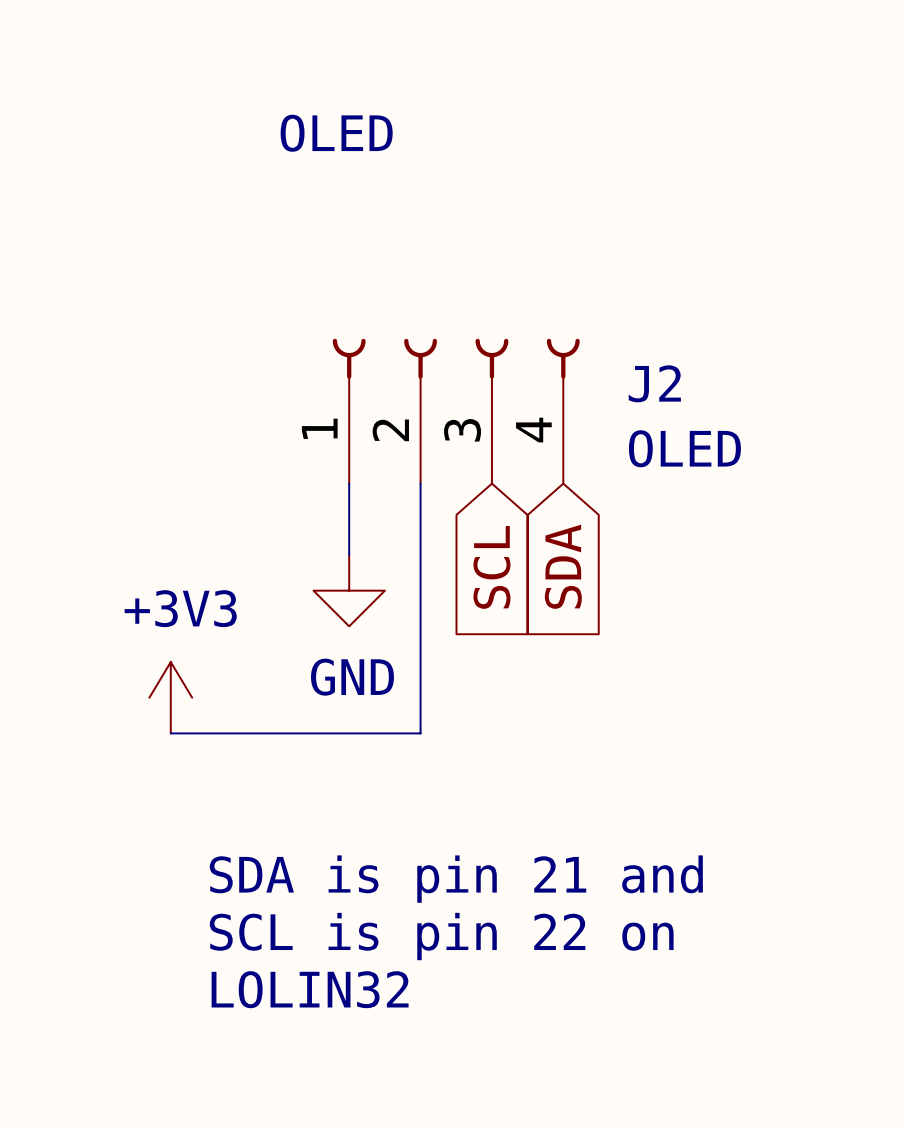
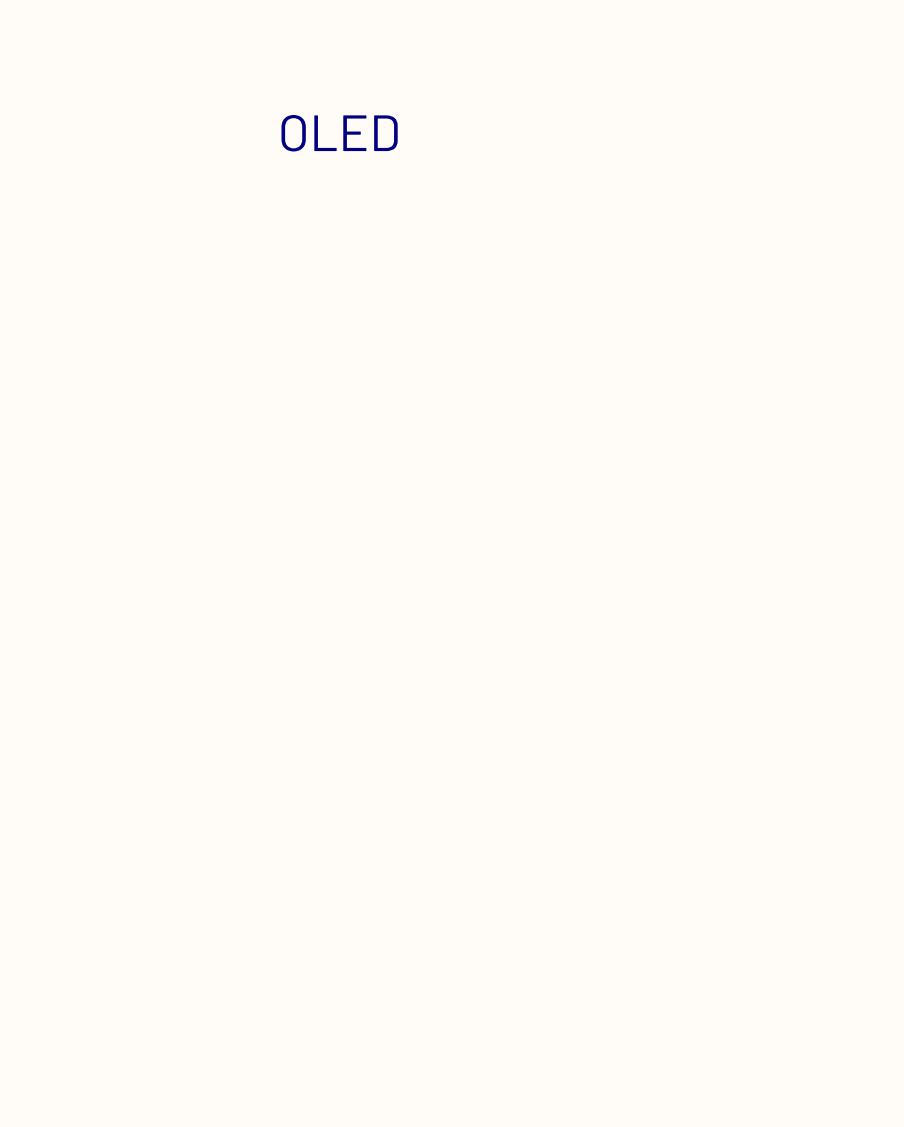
J2: OLED (456, 411) -> none
wire: (349, 483) (349, 554) -> none
wire: (420, 483) (420, 733) (170, 733) -> none
global label: SDA (563, 566) -> none
global label: SCL (491, 567) -> none
power symbol: GND (349, 590) -> none
power symbol: +3V3 (170, 697) -> none
text: SDA is pin 21 and (456, 879) -> none
text: SCL is pin 22 on (441, 936) -> none
text: LOLIN32 (310, 989) -> none

